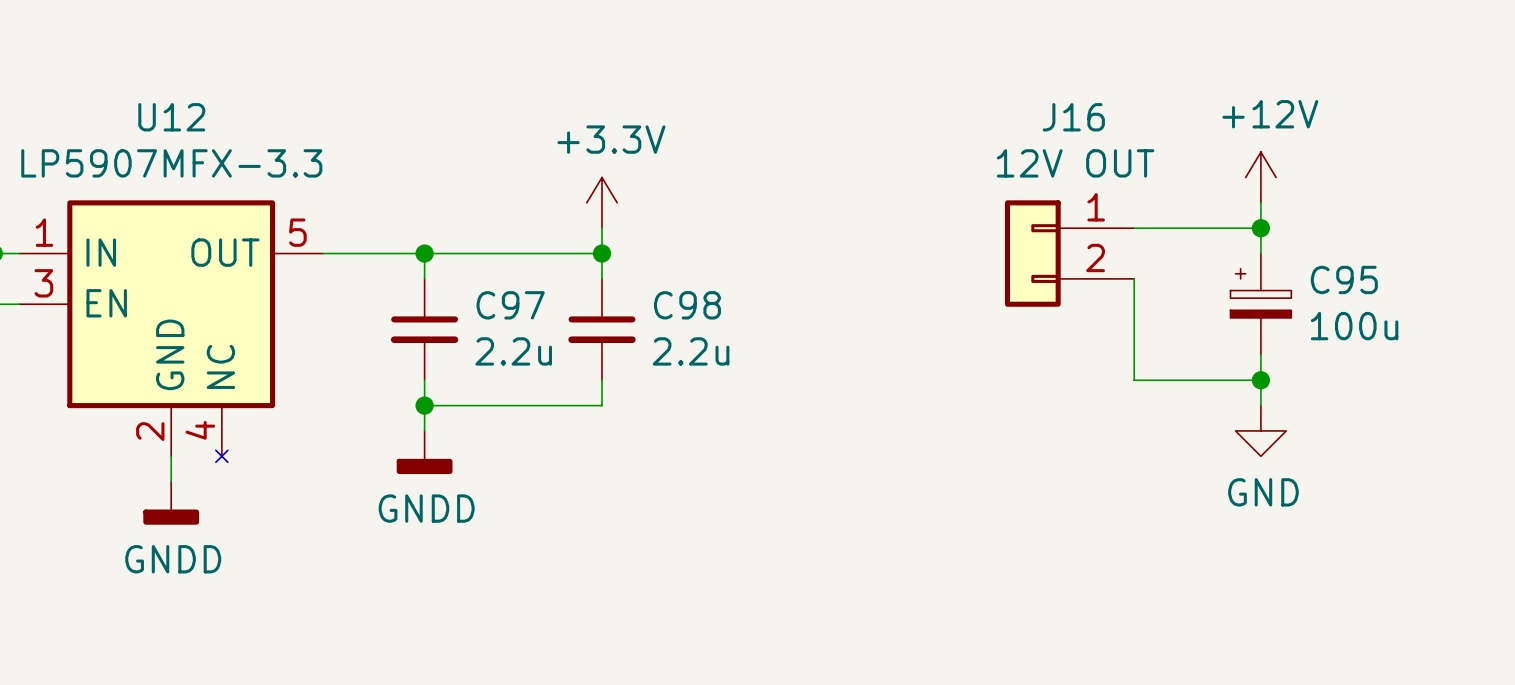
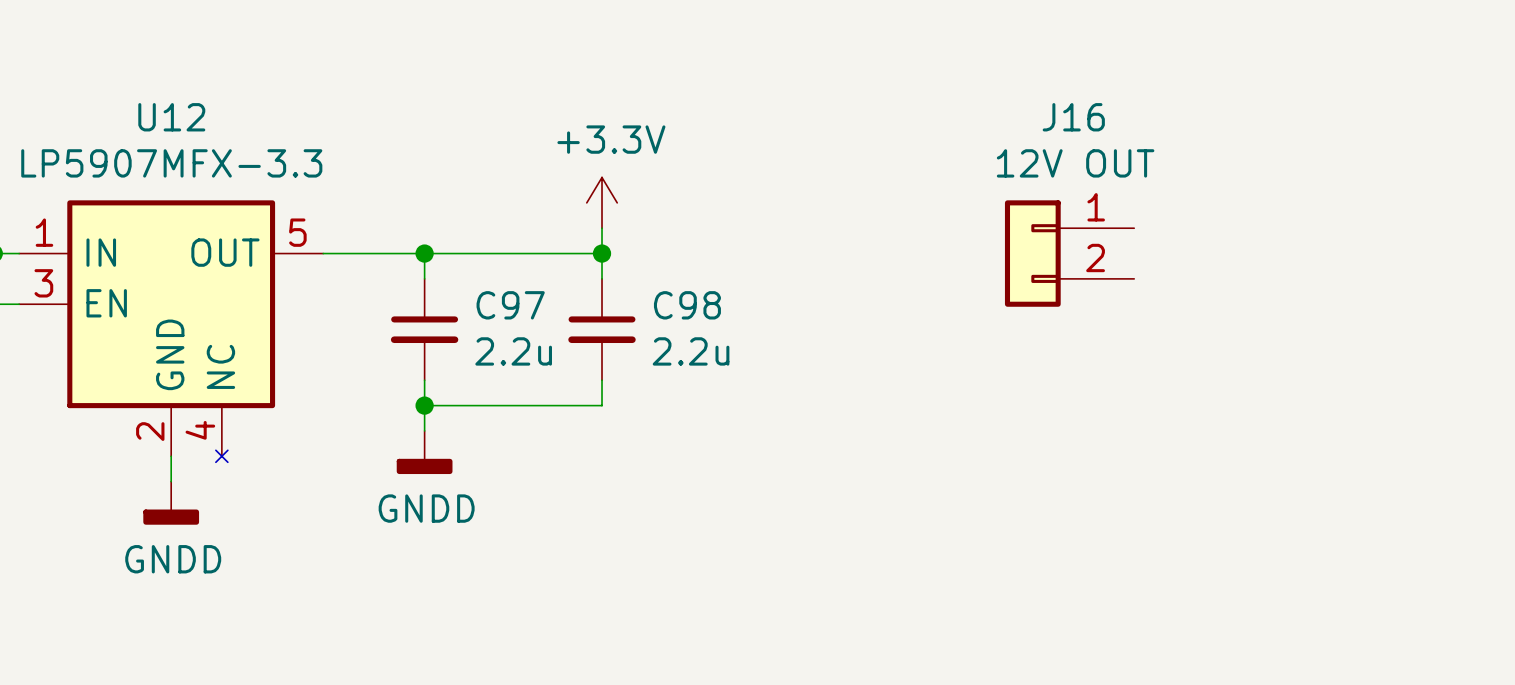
power symbol: +12V (1260, 177) -> none
wire: (1260, 202) (1260, 253) -> none
wire: (1134, 228) (1260, 228) -> none
junction: (1260, 228) -> none
wire: (1134, 278) (1134, 380) (1260, 380) -> none
C95: 100u (1260, 304) -> none
wire: (1260, 354) (1260, 405) -> none
junction: (1260, 380) -> none
power symbol: GND (1260, 430) -> none

